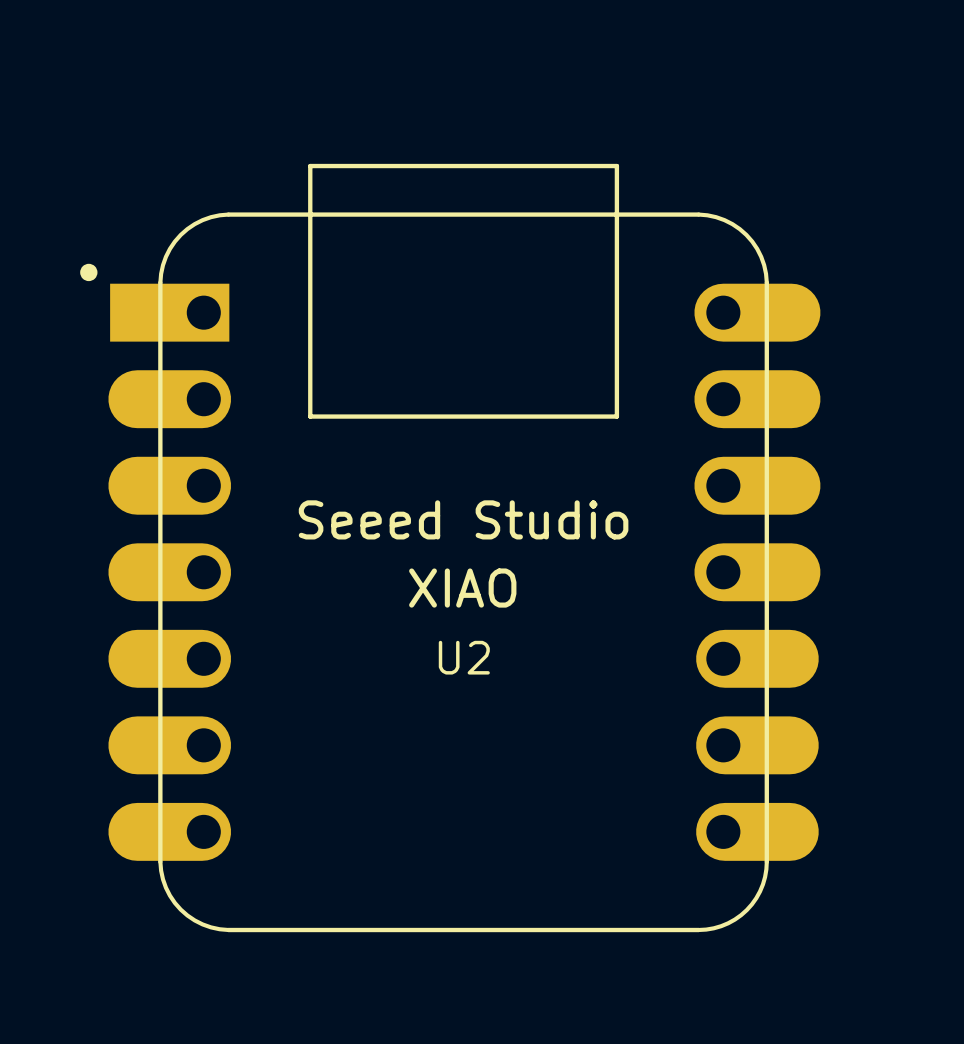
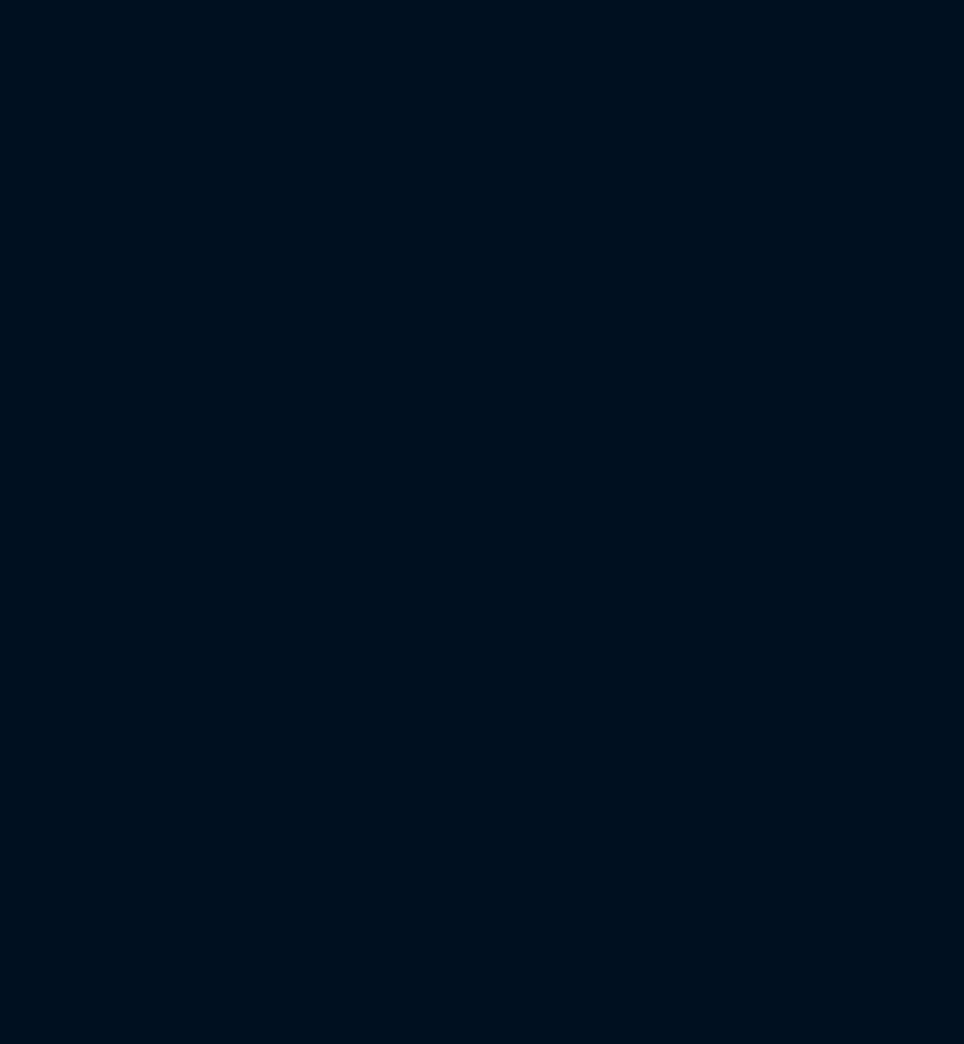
U2: (450, 548) -> none

